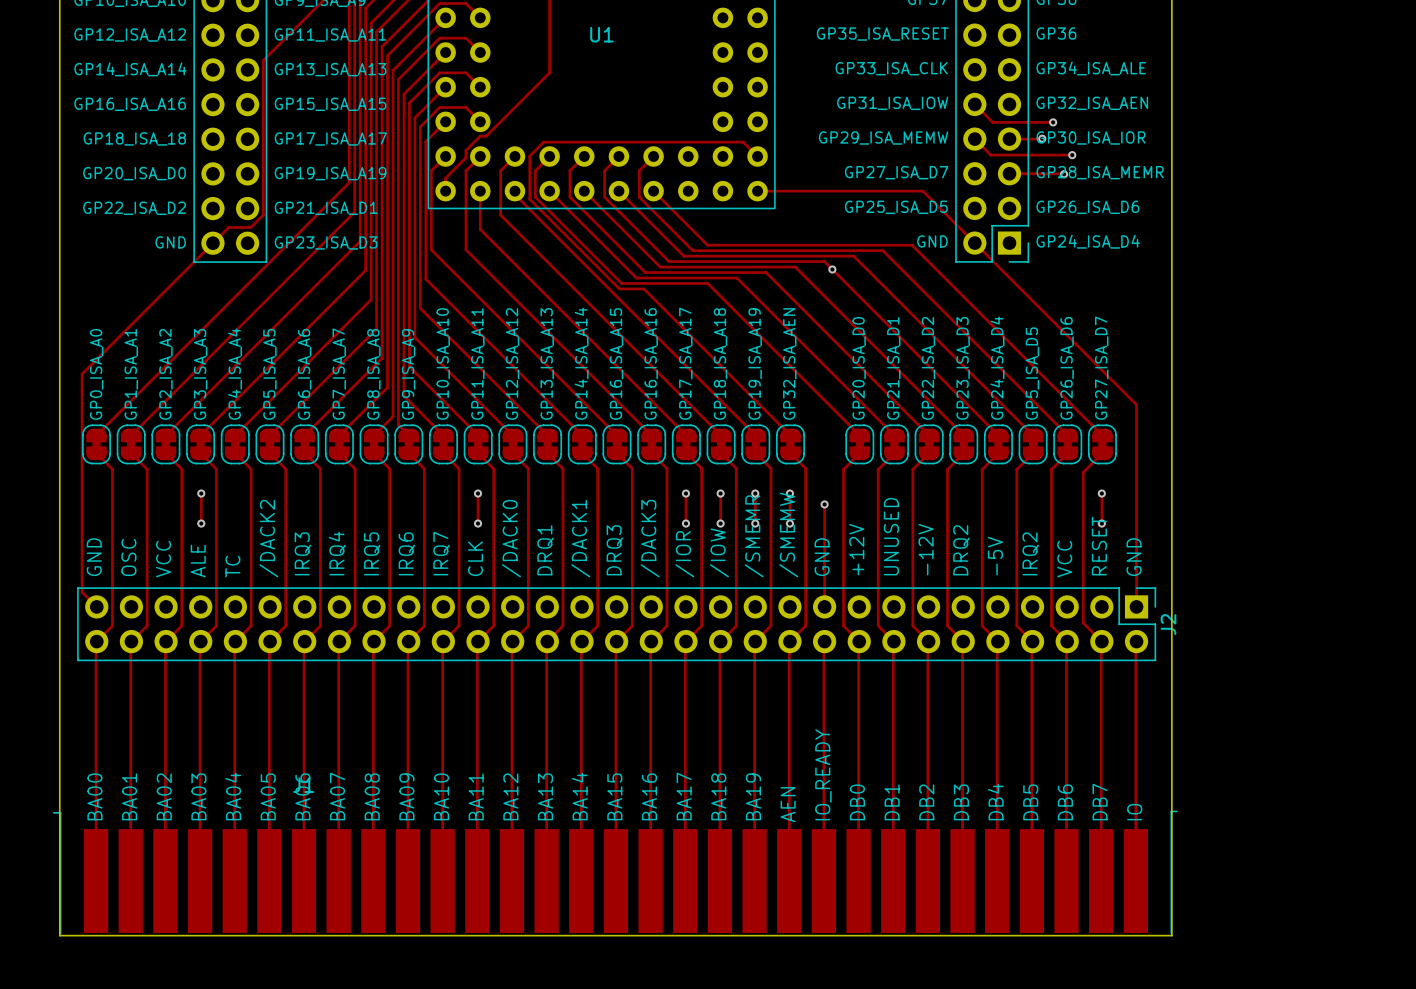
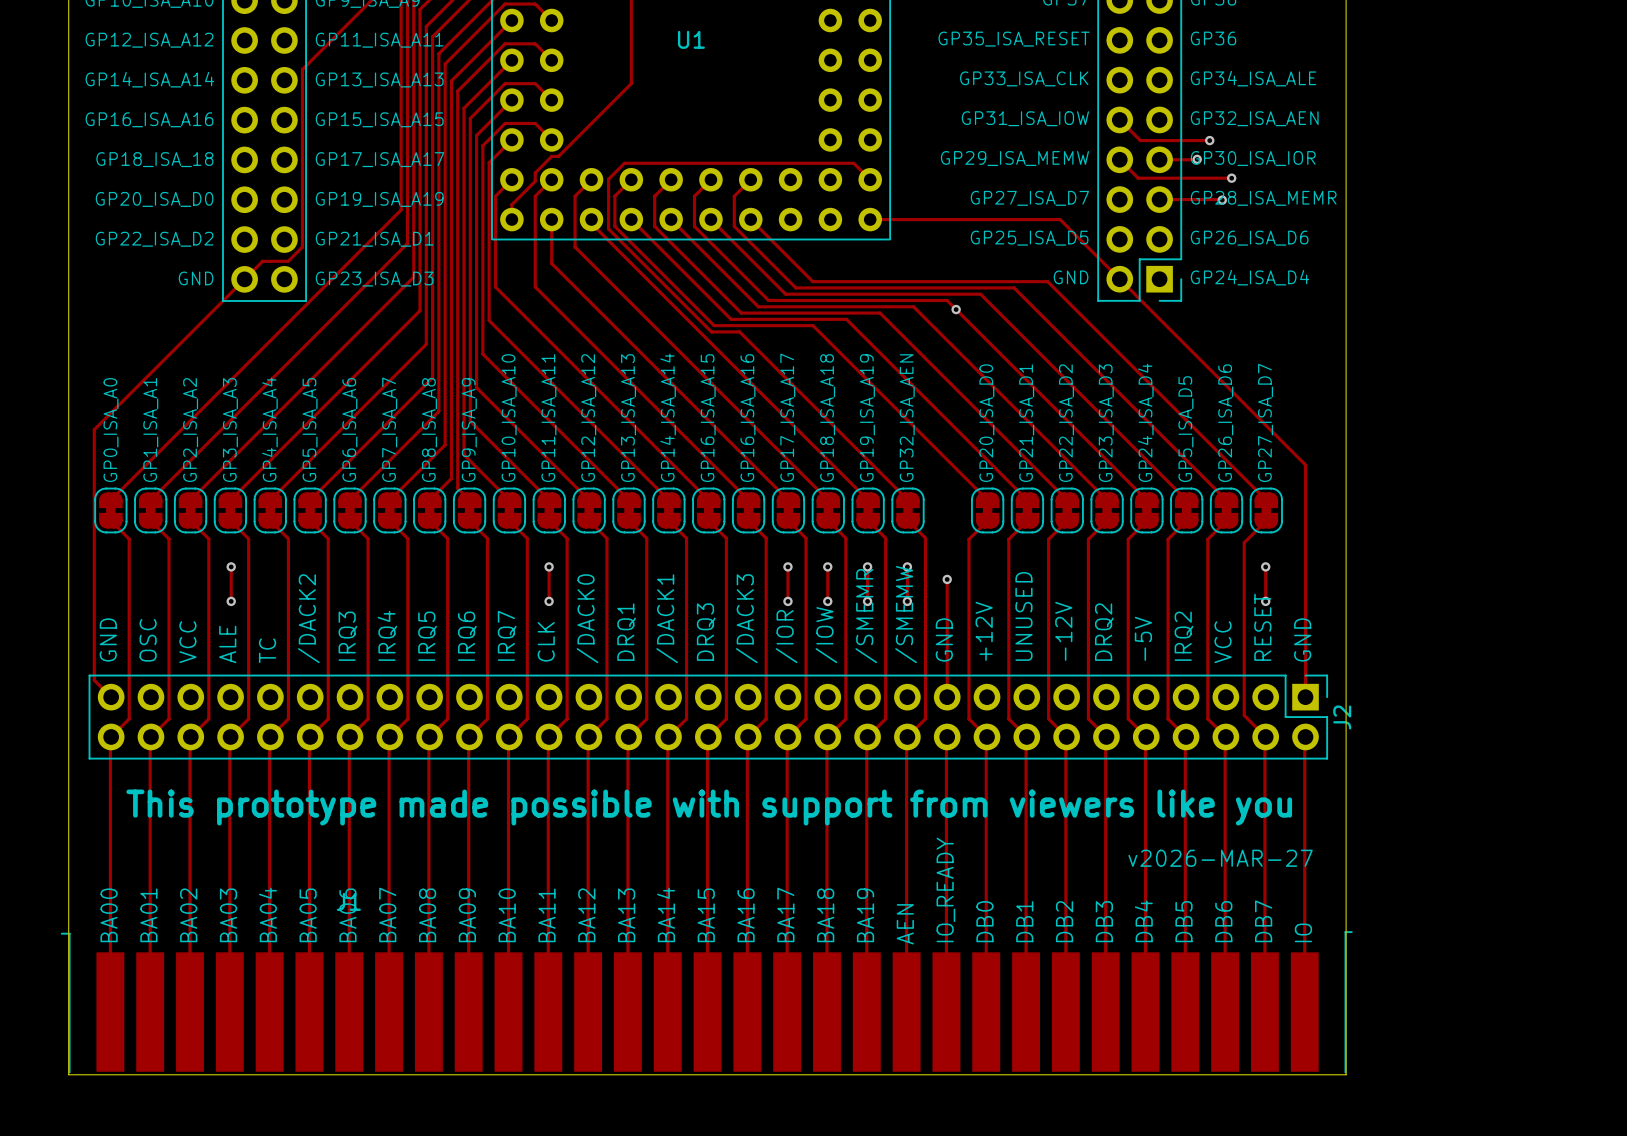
text: none -> This prototype made possible with support from viewers like you (709, 807)
text: none -> v2026-MAR-27 (1220, 858)

